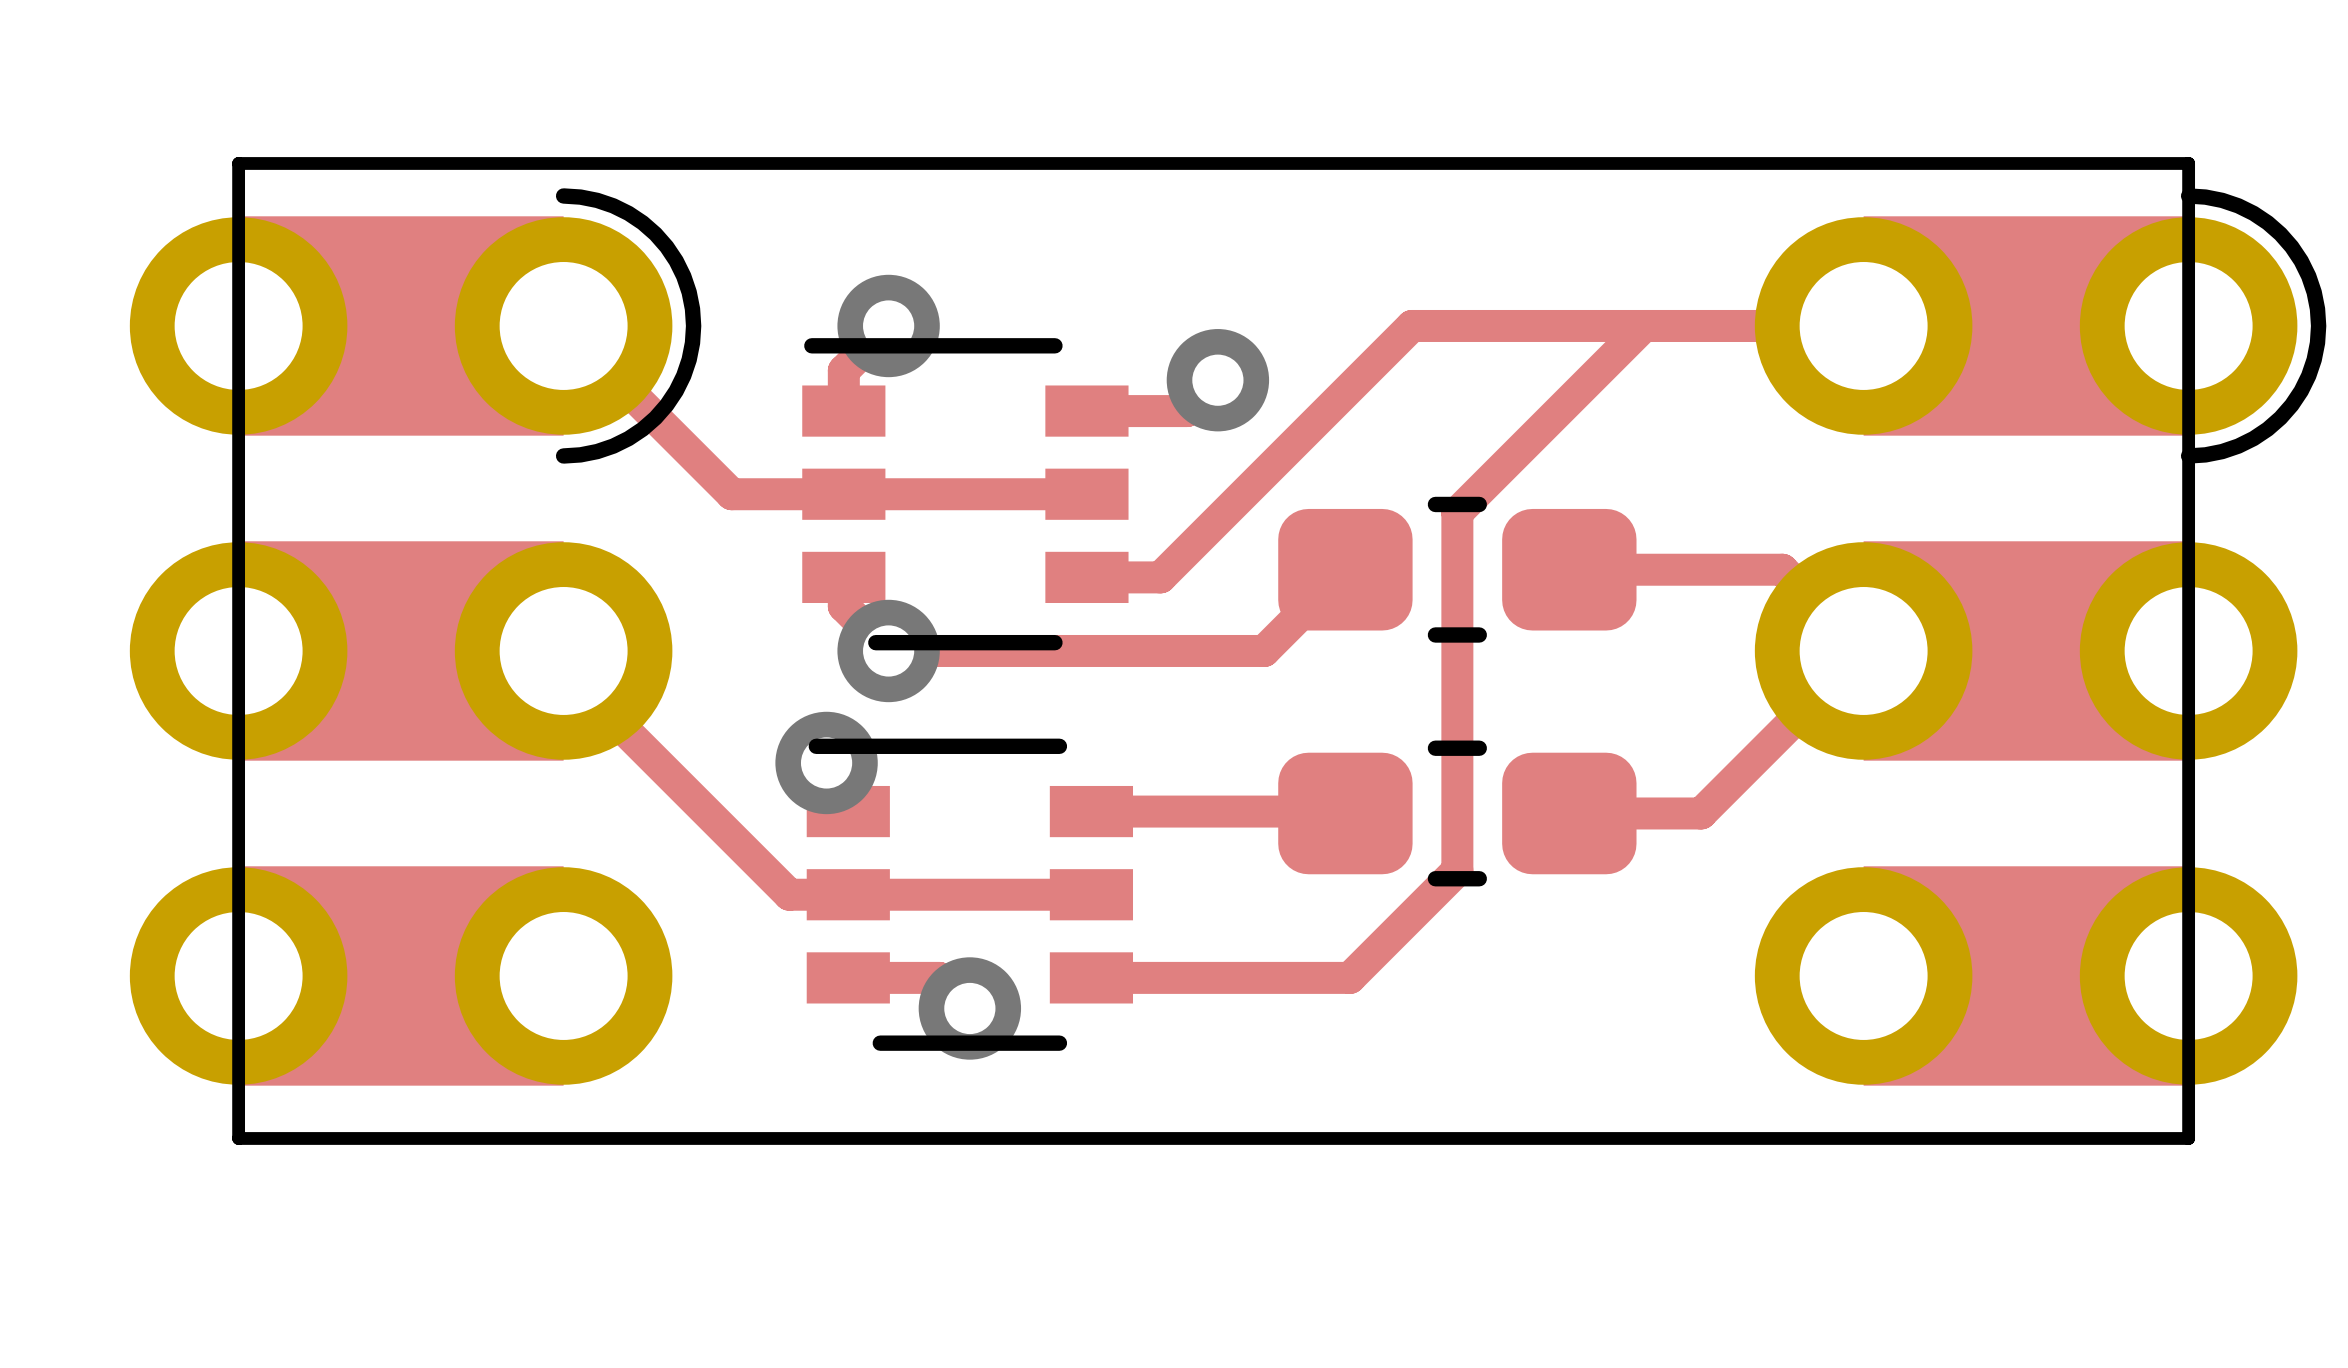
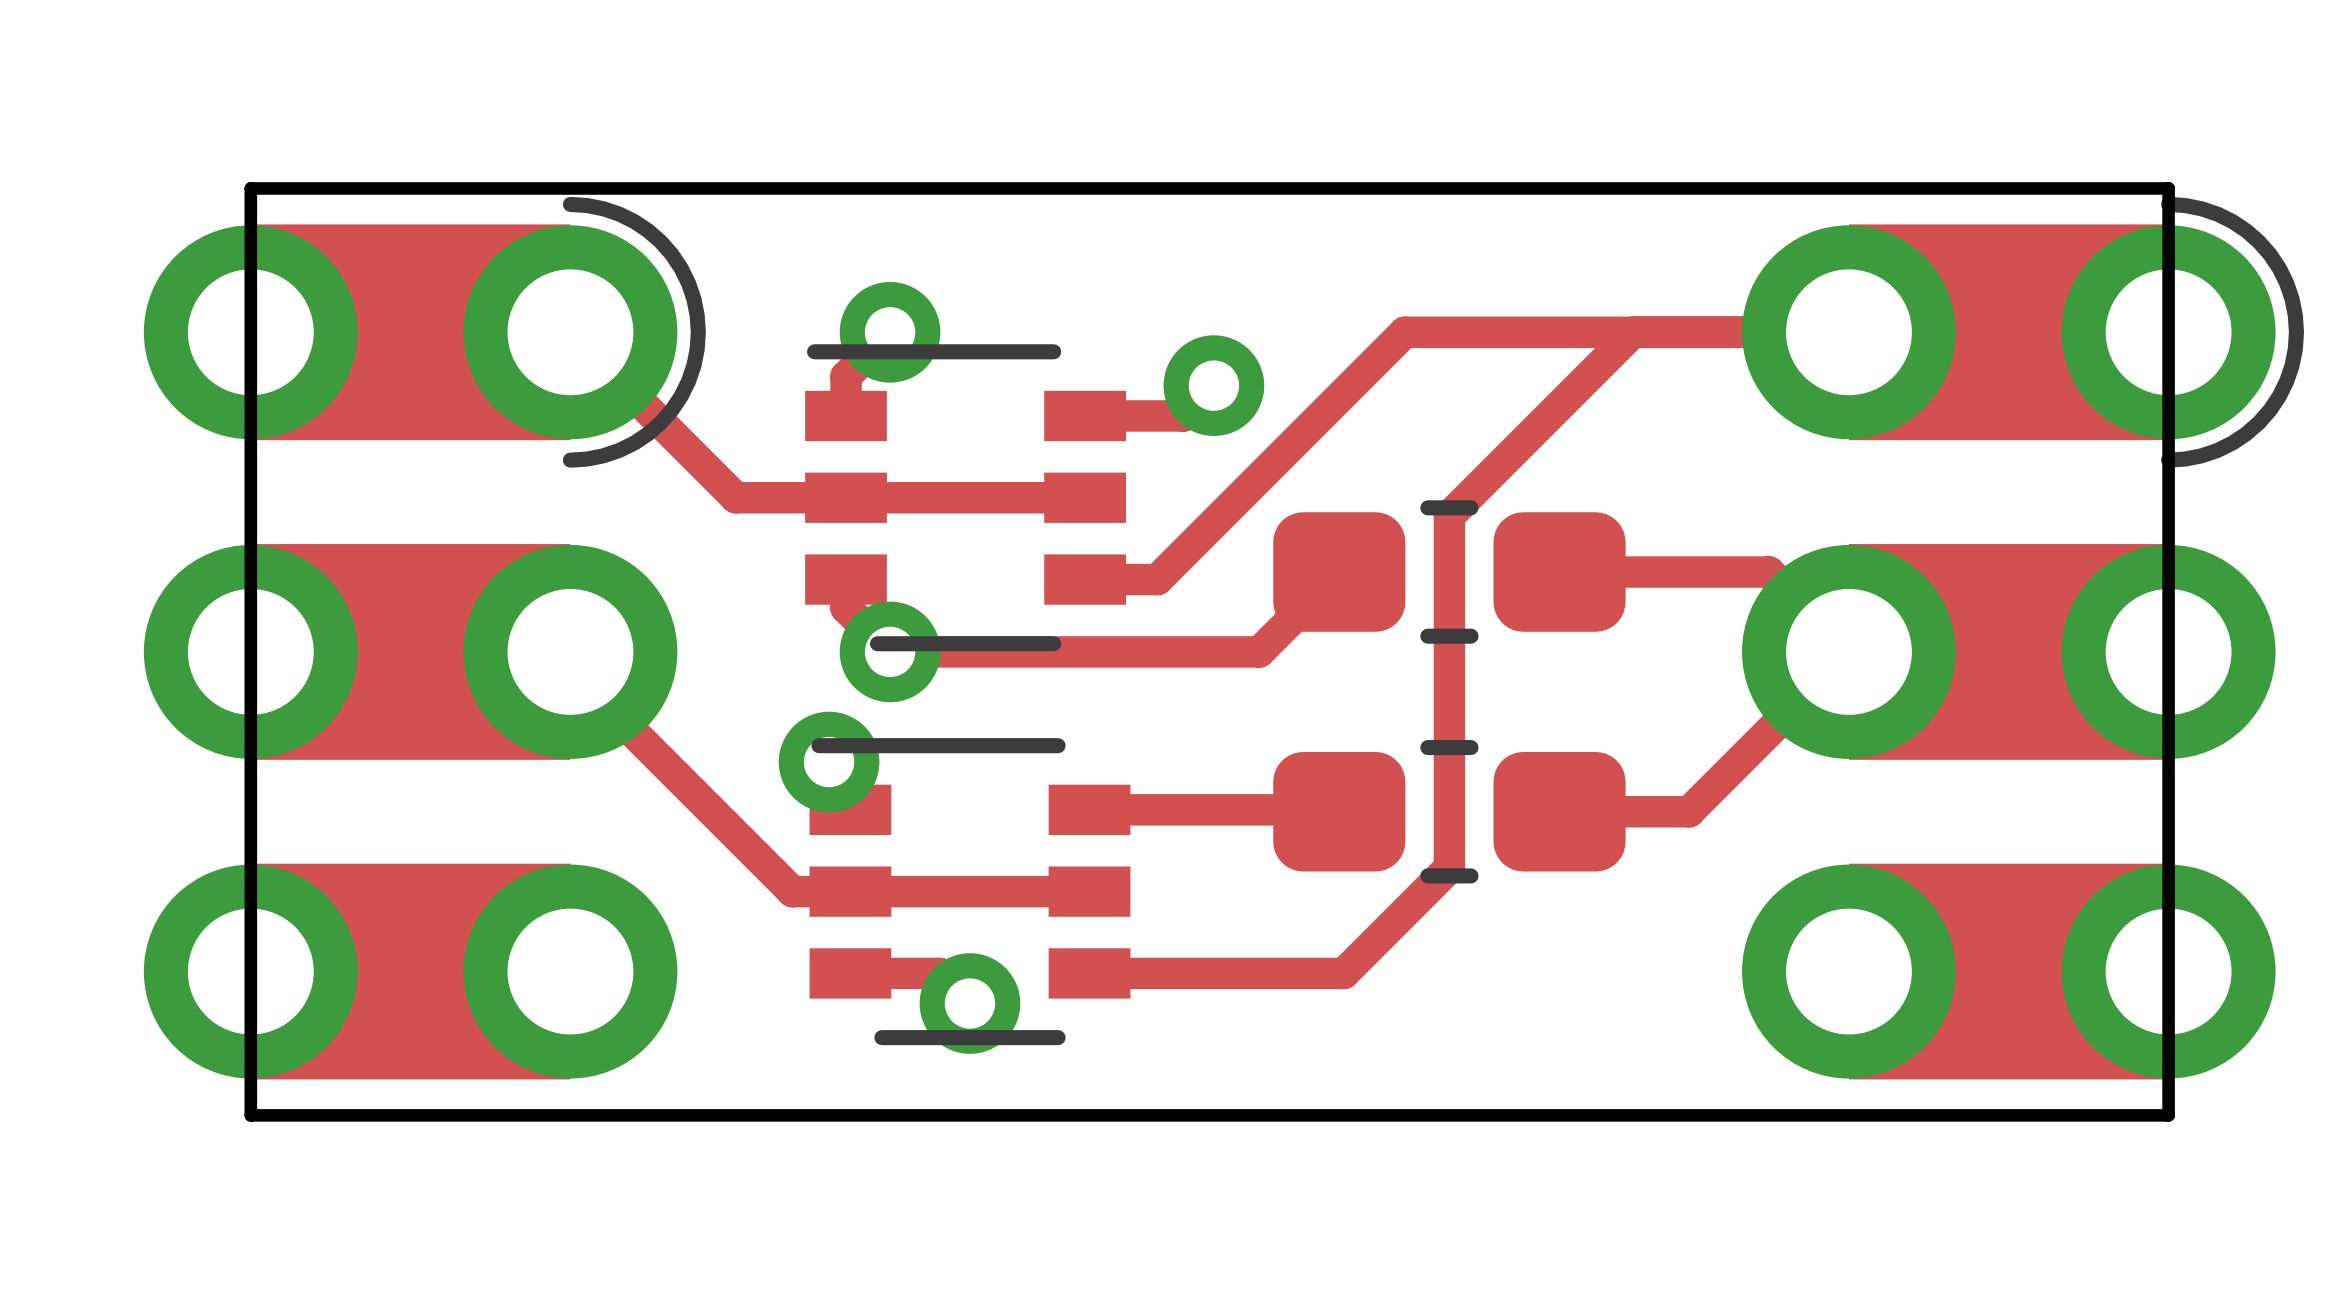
board edge: (238, 179) (238, 163) (2188, 163) (2188, 179) -> (250, 188) (2168, 188)
board edge: (238, 1122) (238, 1138) (2188, 1138) (2188, 1122) -> (250, 1115) (2168, 1115)

